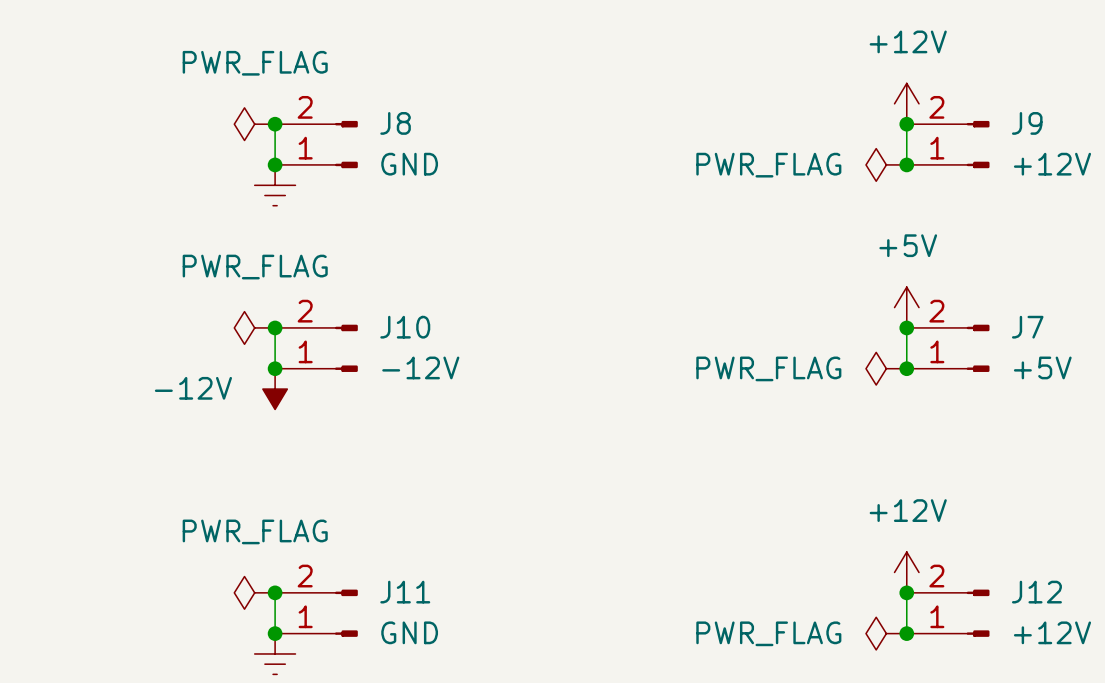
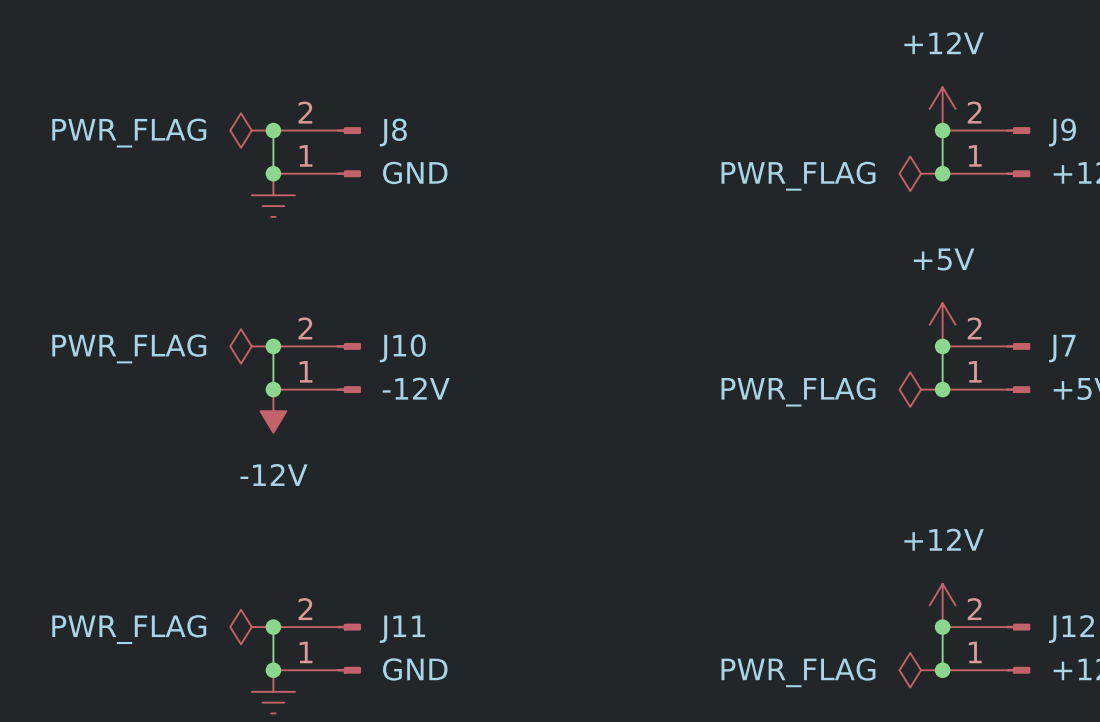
power symbol text position: PWR_FLAG (255, 63) -> PWR_FLAG (129, 133)
power symbol text position: PWR_FLAG (255, 267) -> PWR_FLAG (129, 348)
power symbol text position: -12V (193, 388) -> -12V (274, 474)
power symbol text position: PWR_FLAG (255, 531) -> PWR_FLAG (129, 629)

